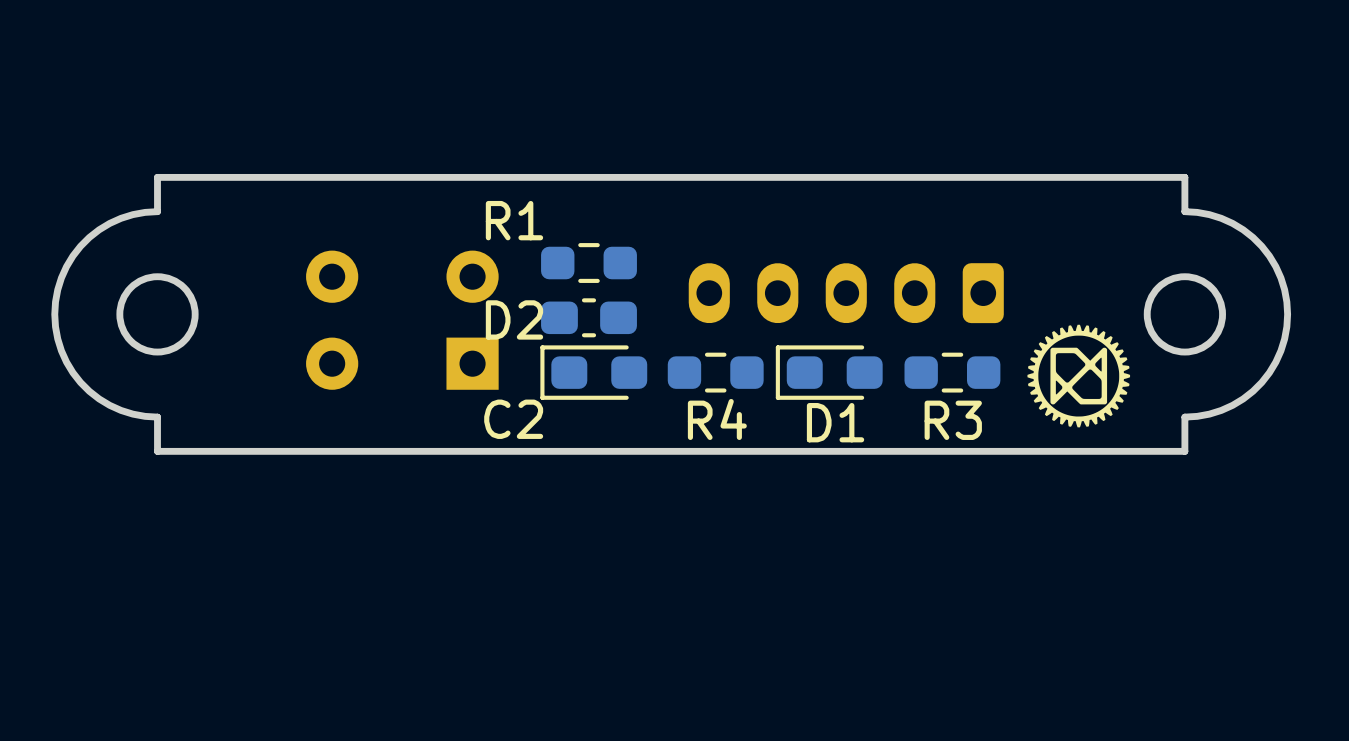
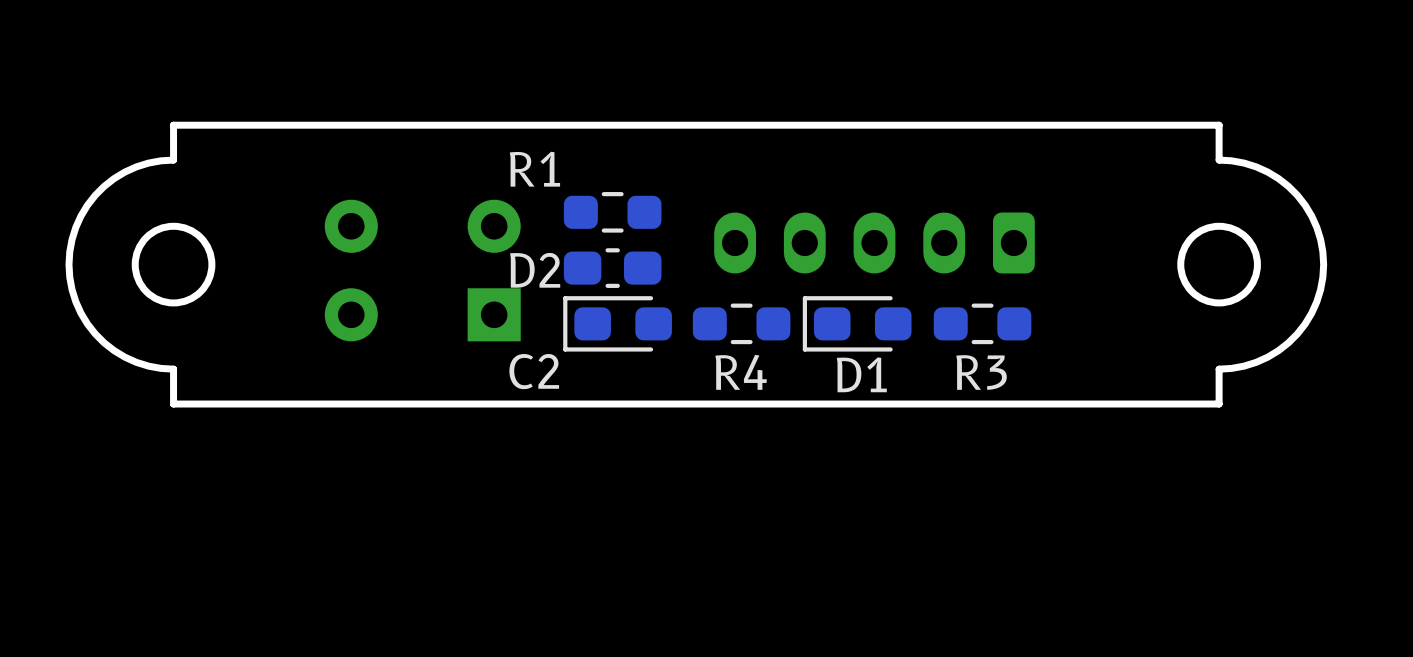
drawing: [1027, 324, 1131, 428] -> none

